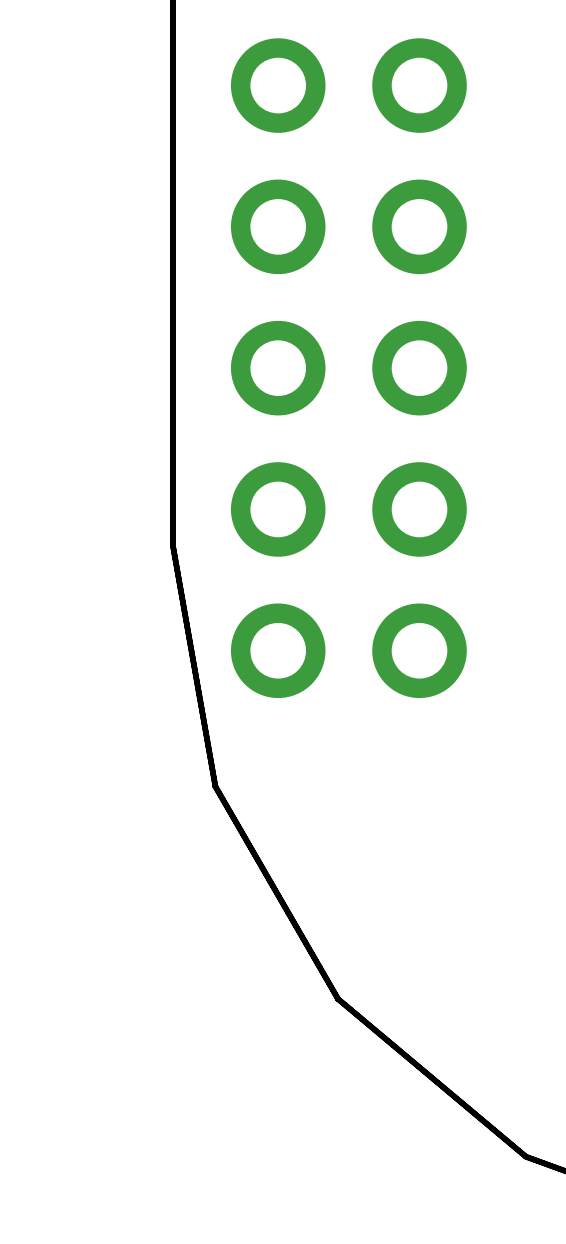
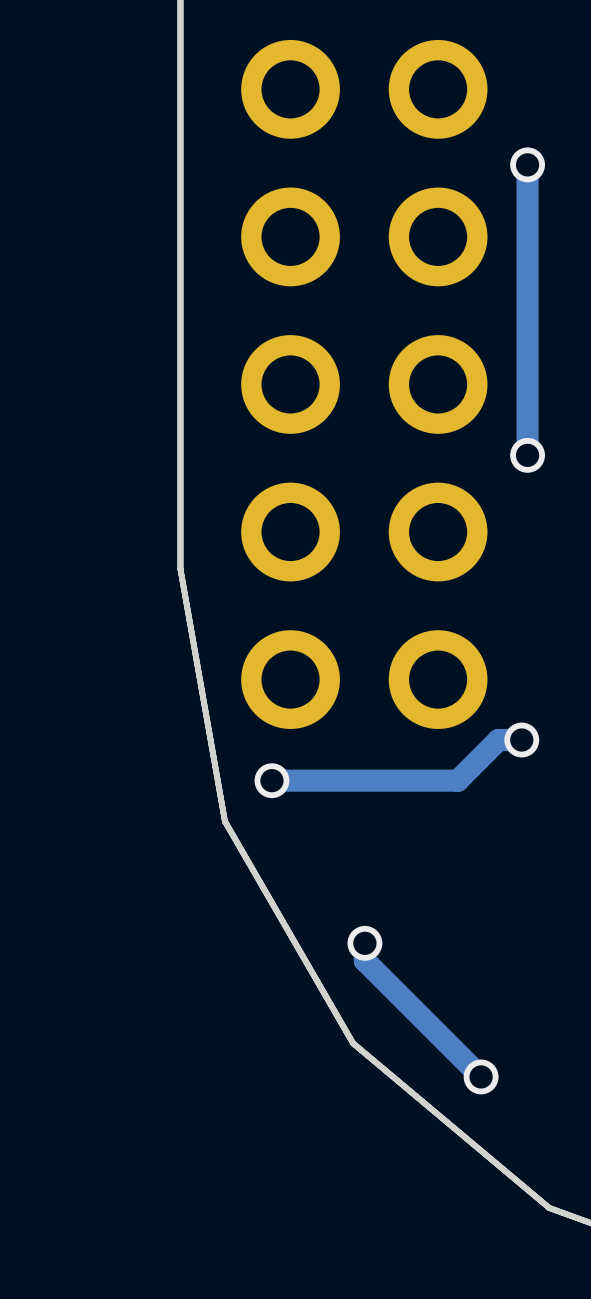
track: none -> (527, 164) (527, 455)
via: none -> (527, 164)
via: none -> (527, 455)
track: none -> (521, 740) (498, 740) (457, 780) (271, 780)
via: none -> (521, 740)
via: none -> (271, 780)
track: none -> (364, 943) (364, 960) (481, 1076)
via: none -> (364, 943)
via: none -> (481, 1076)

